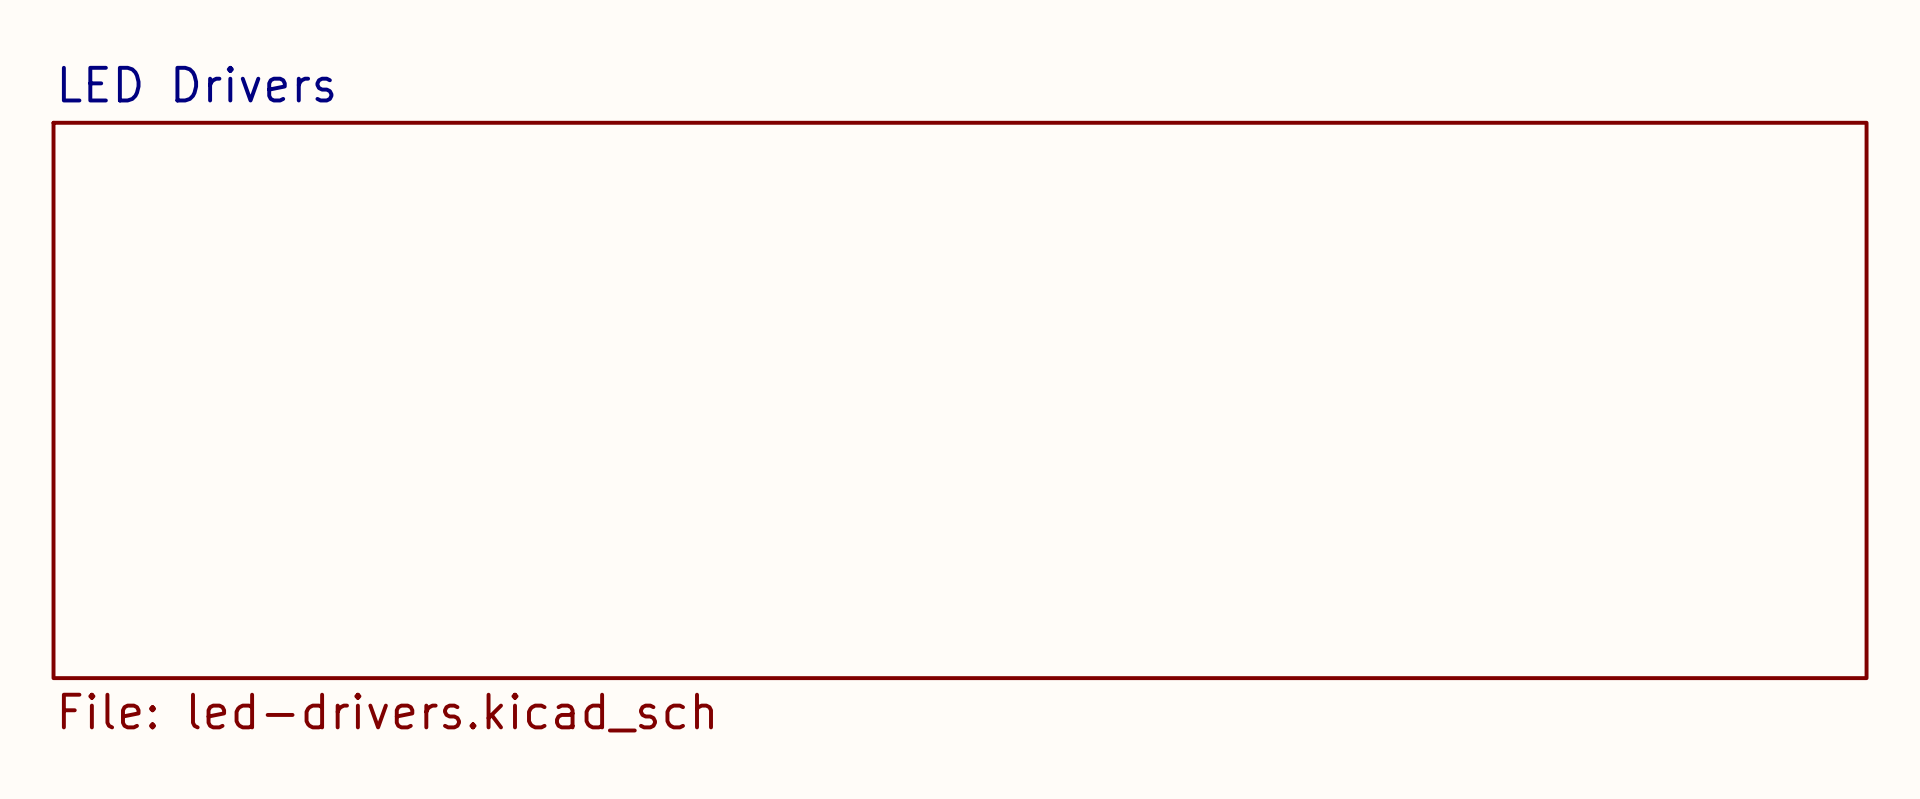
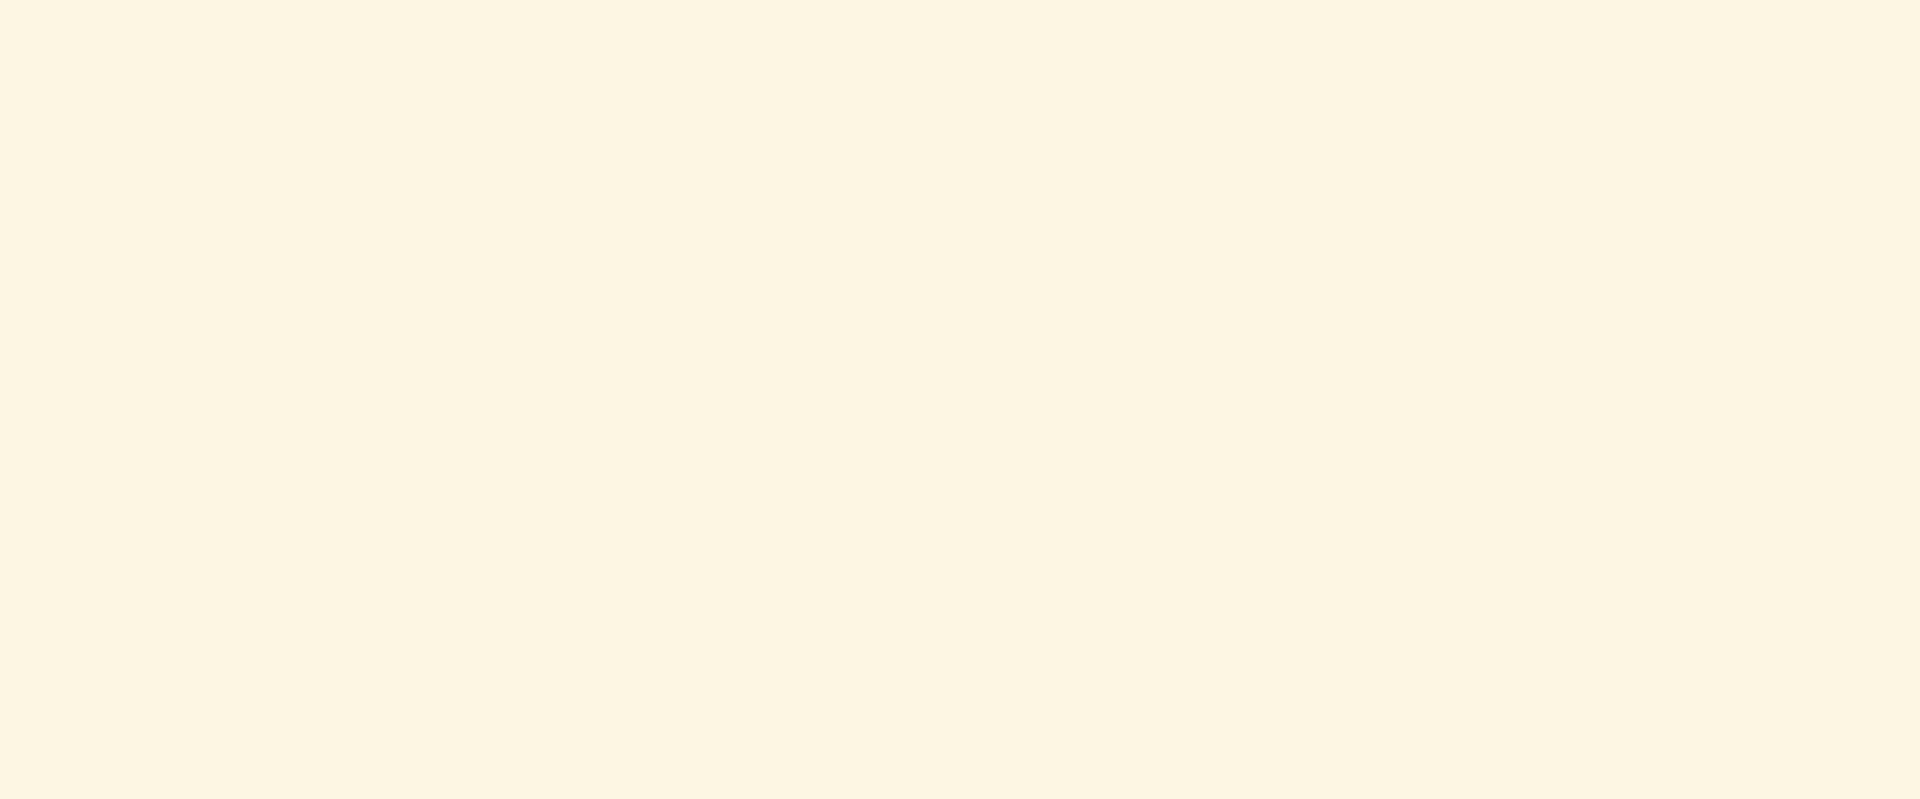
sheet LED Drivers: File: led-drivers.kicad_sch (960, 400) -> none

